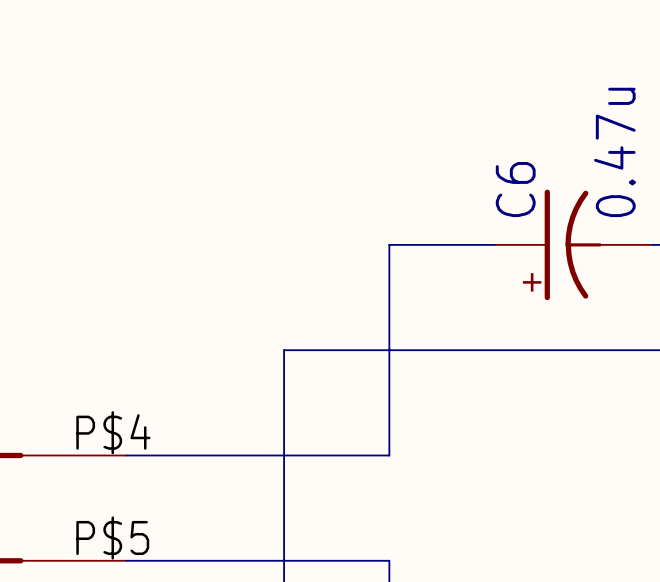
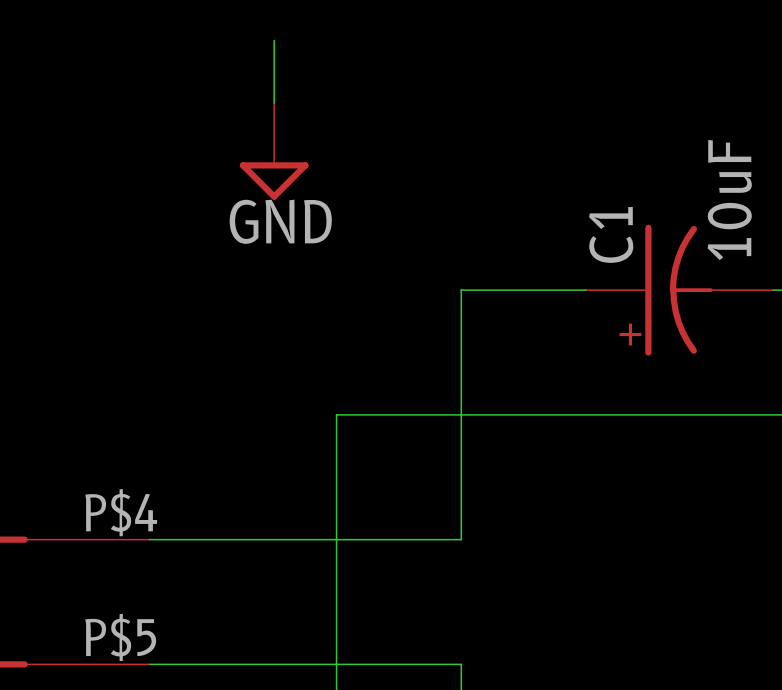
wire: none -> (274, 40) (274, 103)
power symbol: none -> GND (274, 151)
C6 value: 0.47u (614, 152) -> 10uF (729, 200)
C6 name: C6 (515, 189) -> C1 (611, 234)

